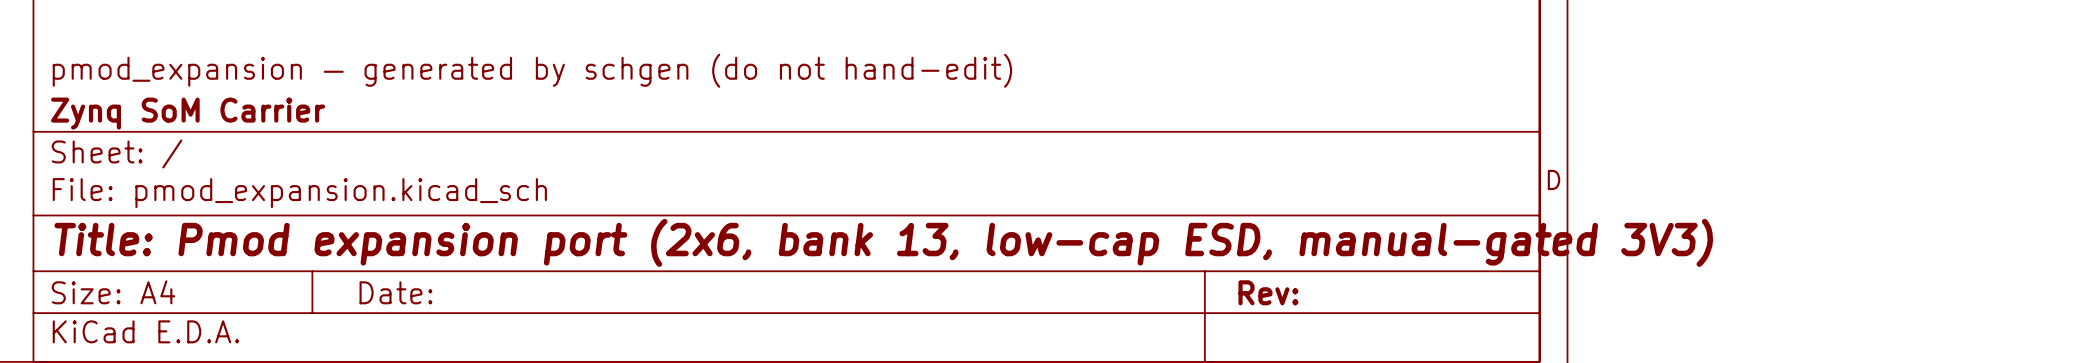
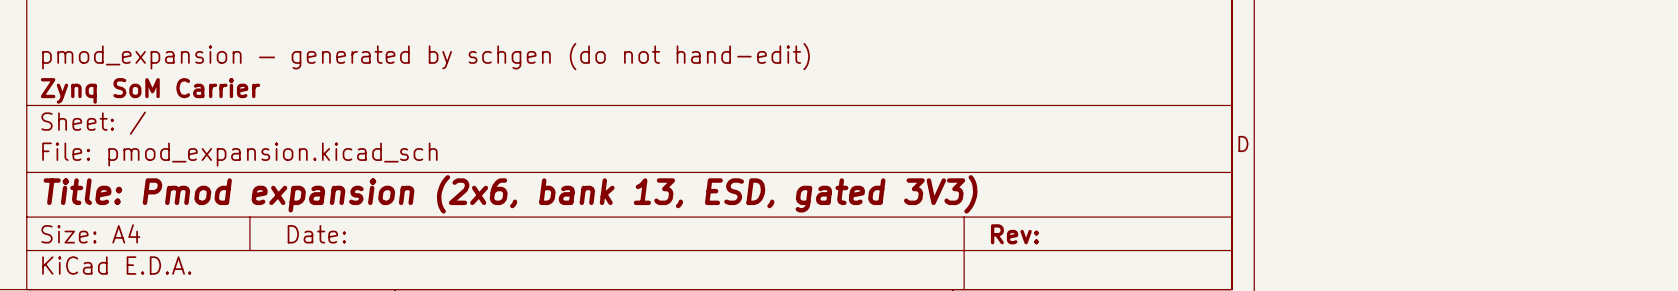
title block: Title: Pmod expansion port (2x6, bank 13, low-cap ESD, manual-gated 3V3) (883, 242) -> Title: Pmod expansion (2x6, bank 13, ESD, gated 3V3) (510, 194)

